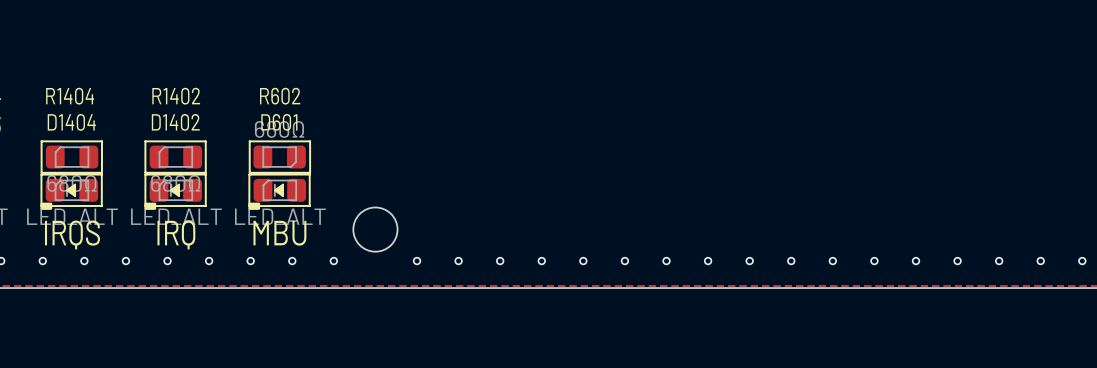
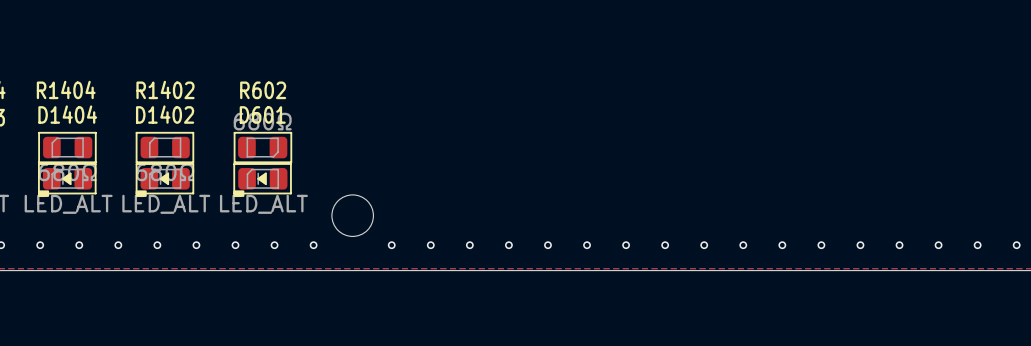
text: MBU (279, 233) -> none
text: IRQS (72, 234) -> none
text: IRQ (176, 234) -> none

